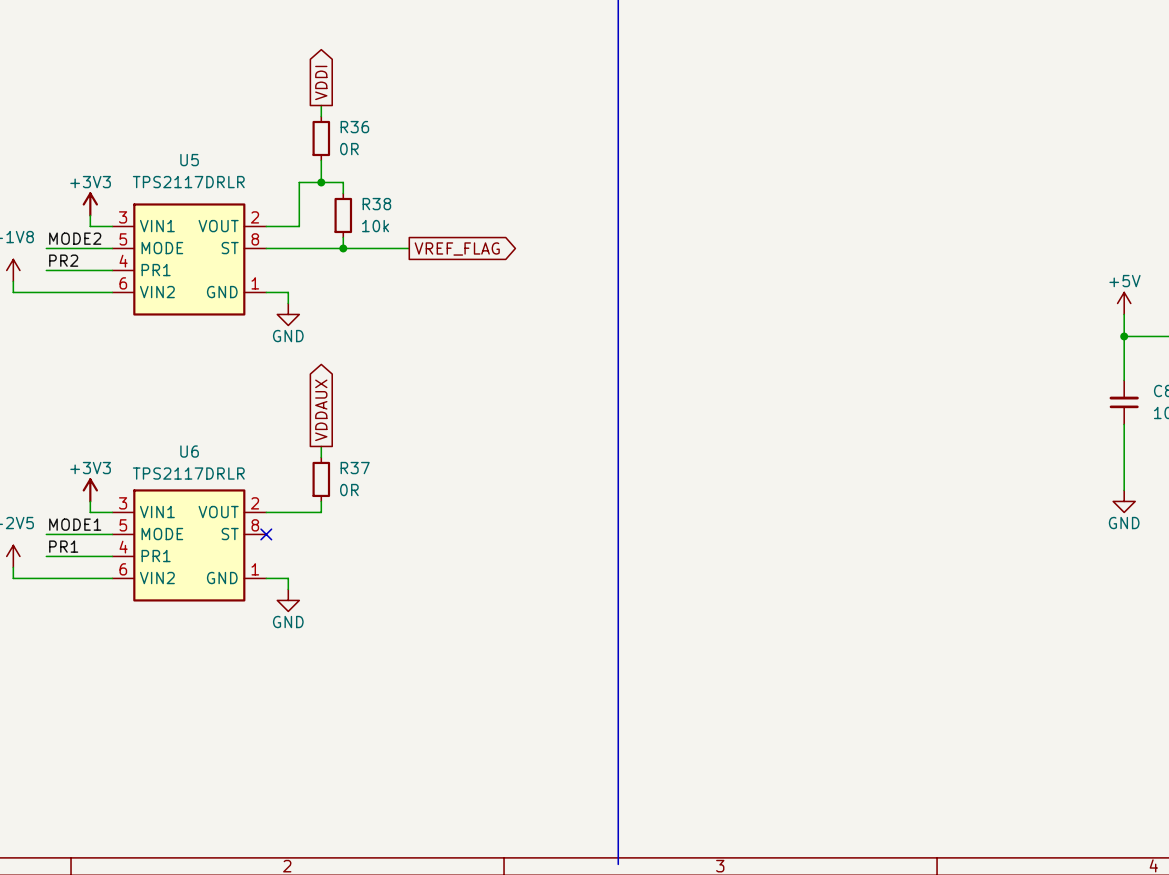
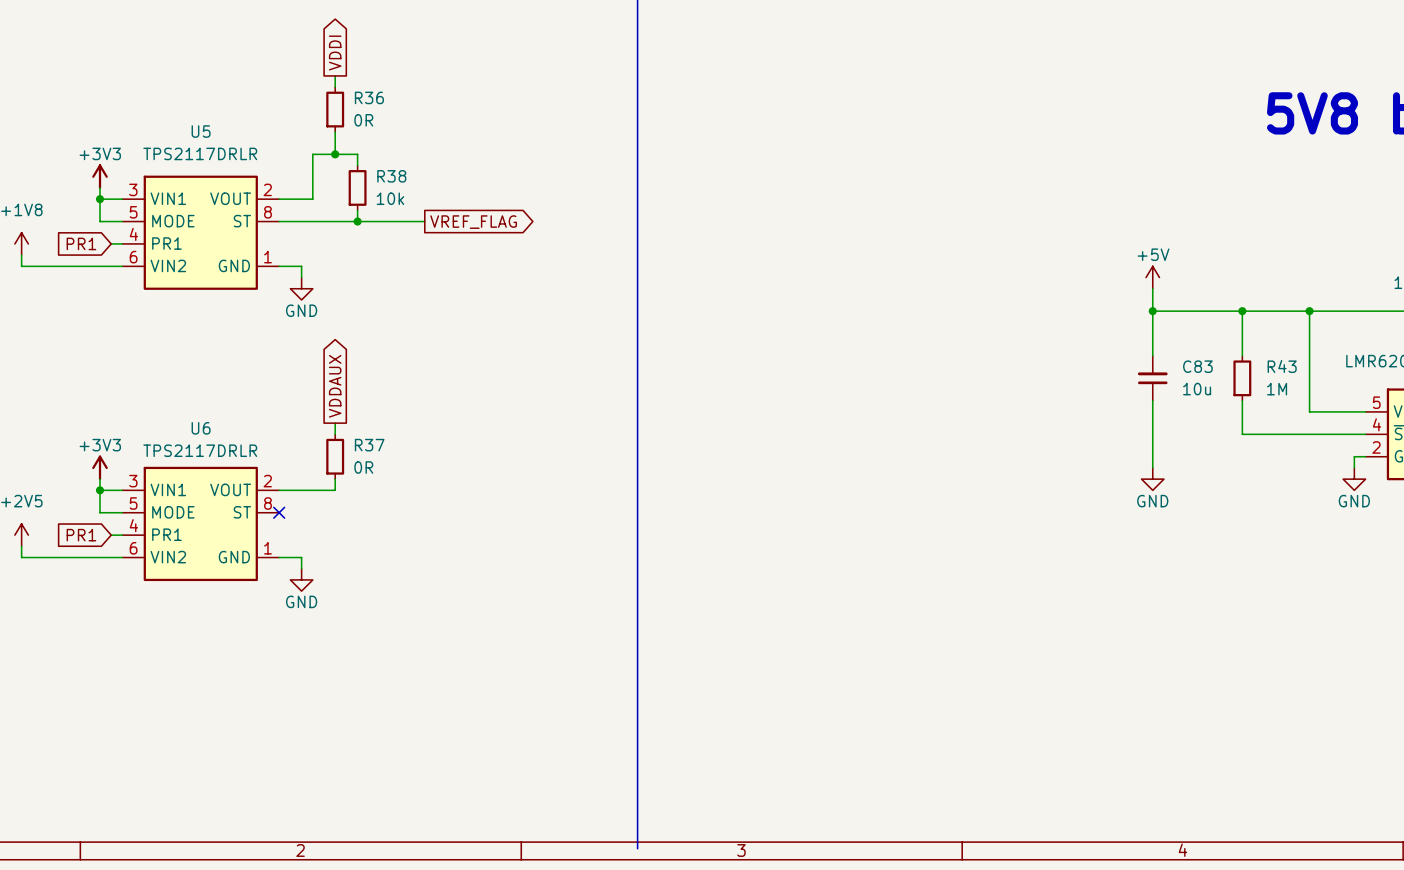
junction: none -> (100, 199)
label: MODE2 (75, 238) -> none
wire: (46, 248) (90, 248) -> (100, 199) (100, 221)
label: PR2 (63, 260) -> none
wire: (46, 270) (101, 270) -> none
global label: none -> PR1 (81, 243)
junction: none -> (100, 490)
label: MODE1 (75, 524) -> none
wire: (46, 534) (90, 534) -> (100, 490) (100, 512)
label: PR1 (63, 546) -> none
wire: (46, 556) (101, 556) -> none
global label: none -> PR1 (81, 535)

